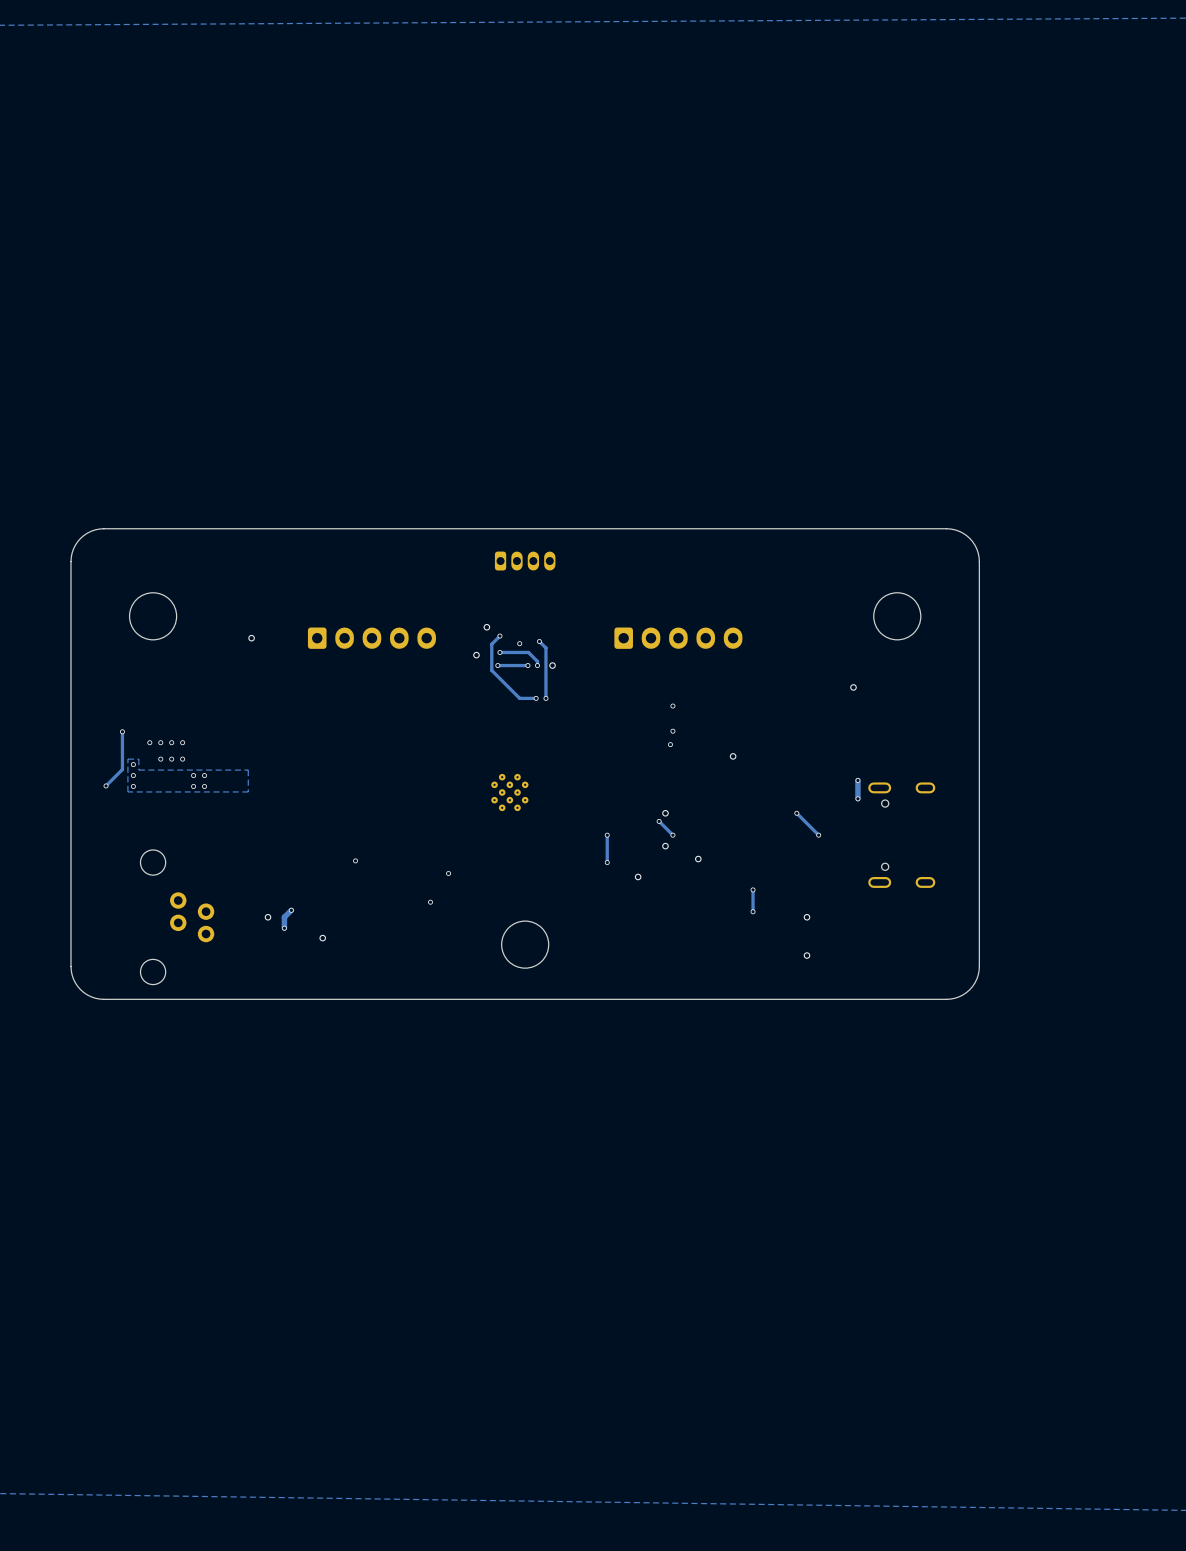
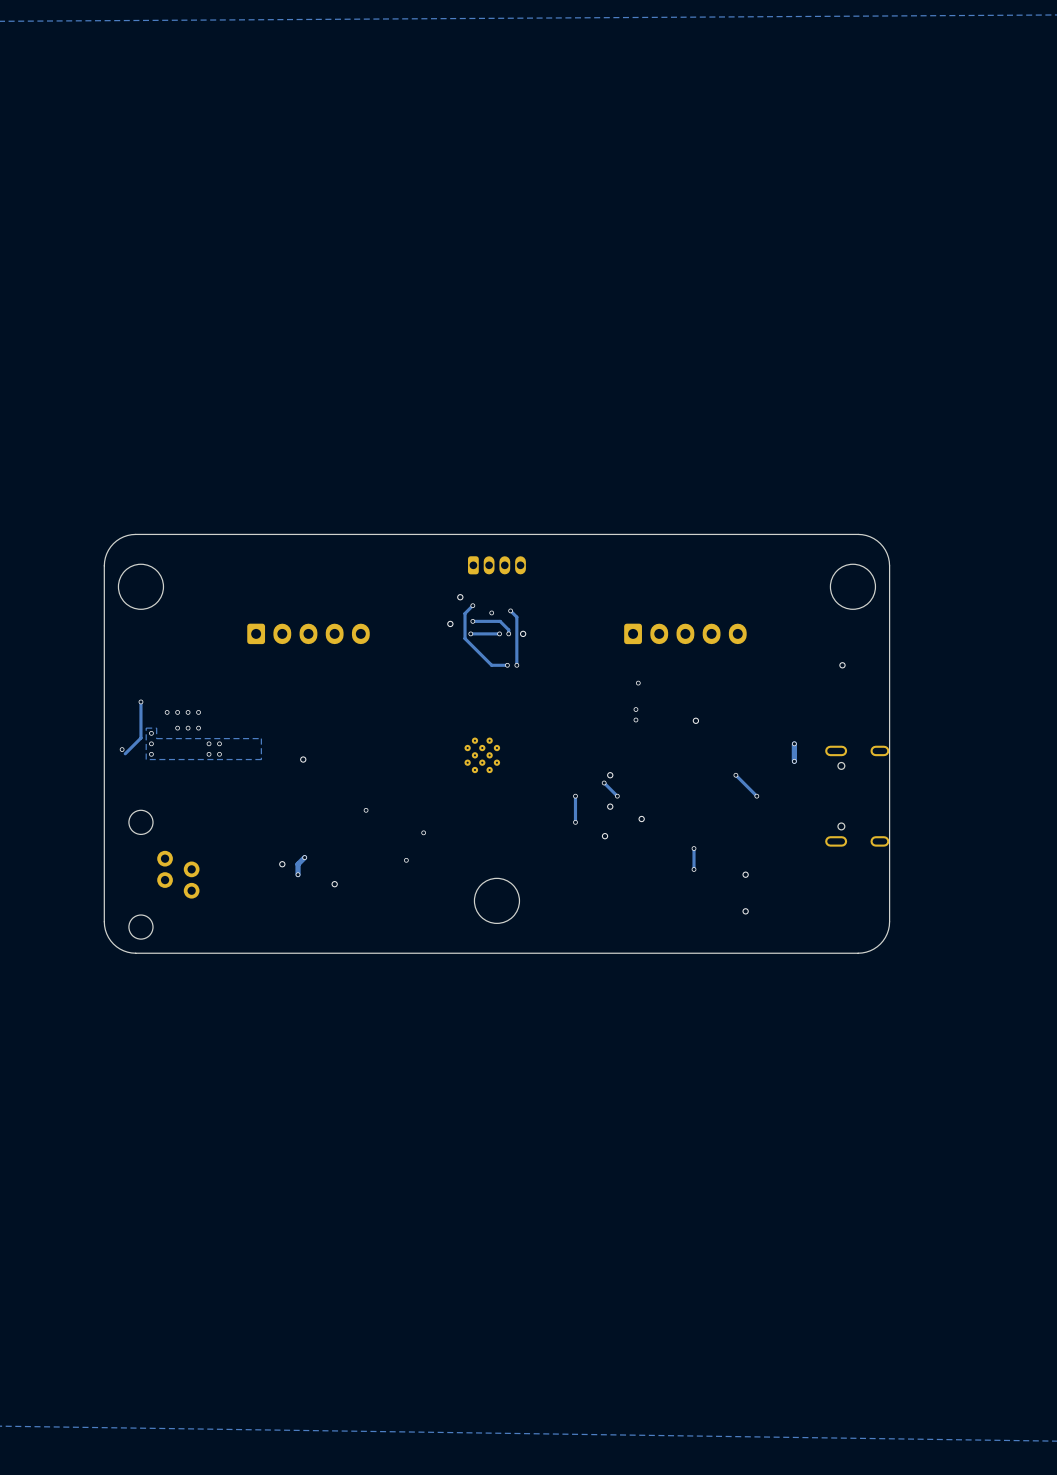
part position: (525, 561) -> (496, 565)
via: (251, 638) -> none
part position: (371, 638) -> (308, 633)
part position: (678, 638) -> (685, 633)
via position: (853, 687) -> (842, 665)
via: (672, 706) -> none
via: none -> (638, 683)
track: (122, 731) (122, 769) (106, 785) -> (140, 701) (140, 738) (125, 753)
via: (122, 731) -> none
via: (672, 731) -> none
via: none -> (140, 701)
via: (149, 742) -> none
via: (160, 742) -> none
via: (171, 742) -> none
via: (182, 742) -> none
via: none -> (167, 712)
via: none -> (177, 712)
via: none -> (188, 712)
via: none -> (198, 712)
via: none -> (635, 720)
zone outline: (138, 759) (127, 759) (127, 791) (248, 791) (248, 770) (138, 770) (138, 759) -> (156, 728) (146, 728) (146, 759) (261, 759) (261, 738) (156, 738) (156, 728)
via: (160, 759) -> none
via: (171, 759) -> none
via: (182, 759) -> none
via: (133, 764) -> none
via: none -> (177, 728)
via: none -> (188, 728)
via: none -> (198, 728)
via: none -> (151, 733)
via: (133, 775) -> none
via: (193, 775) -> none
via: (204, 775) -> none
via: none -> (151, 743)
via: none -> (209, 743)
via: none -> (219, 743)
via: none -> (794, 743)
track: (857, 780) (857, 798) -> (794, 743) (794, 761)
via: (857, 780) -> none
via: (106, 785) -> none
via: (193, 786) -> none
via: (204, 786) -> none
via: none -> (151, 754)
via: none -> (209, 754)
via: none -> (219, 754)
via: none -> (303, 759)
via: none -> (794, 761)
via: (857, 798) -> none
via: none -> (610, 775)
via: (665, 813) -> none
via: none -> (735, 775)
track: (796, 813) (818, 835) -> (735, 775) (756, 796)
via: (796, 813) -> none
via: none -> (604, 782)
track: (659, 821) (672, 835) -> (604, 782) (617, 796)
via: (659, 821) -> none
via: none -> (617, 796)
via: (672, 835) -> none
via: none -> (756, 796)
via: (818, 835) -> none
via: none -> (610, 806)
via: (665, 846) -> none
via: none -> (366, 810)
via: none -> (641, 819)
via: (698, 859) -> none
via: (355, 860) -> none
via: none -> (694, 848)
track: (753, 889) (753, 911) -> (694, 848) (694, 869)
via: (753, 889) -> none
via: none -> (304, 857)
via: none -> (282, 864)
track: (291, 910) (284, 917) (284, 928) -> (304, 857) (298, 864) (298, 874)
via: (291, 910) -> none
via: none -> (694, 869)
via: (753, 911) -> none
via: (267, 917) -> none
via: none -> (298, 874)
via position: (806, 917) -> (745, 874)
via: none -> (334, 884)
via: (284, 928) -> none
via: (322, 938) -> none
via position: (806, 955) -> (745, 911)
board edge: (902, 999) (946, 999) (959, 996) (972, 986) (979, 970) (979, 561) (974, 545) (962, 533) (946, 528) (99, 529) (87, 533) (80, 538) (73, 549) (71, 561) (71, 970) (77, 986) (91, 996) (103, 999) (147, 999) -> (858, 953) (870, 950) (880, 944) (887, 933) (889, 921) (889, 561) (885, 550) (880, 543) (870, 536) (858, 534) (135, 534) (120, 538) (108, 550) (104, 565) (104, 921) (106, 933) (113, 944) (123, 950) (135, 953)

